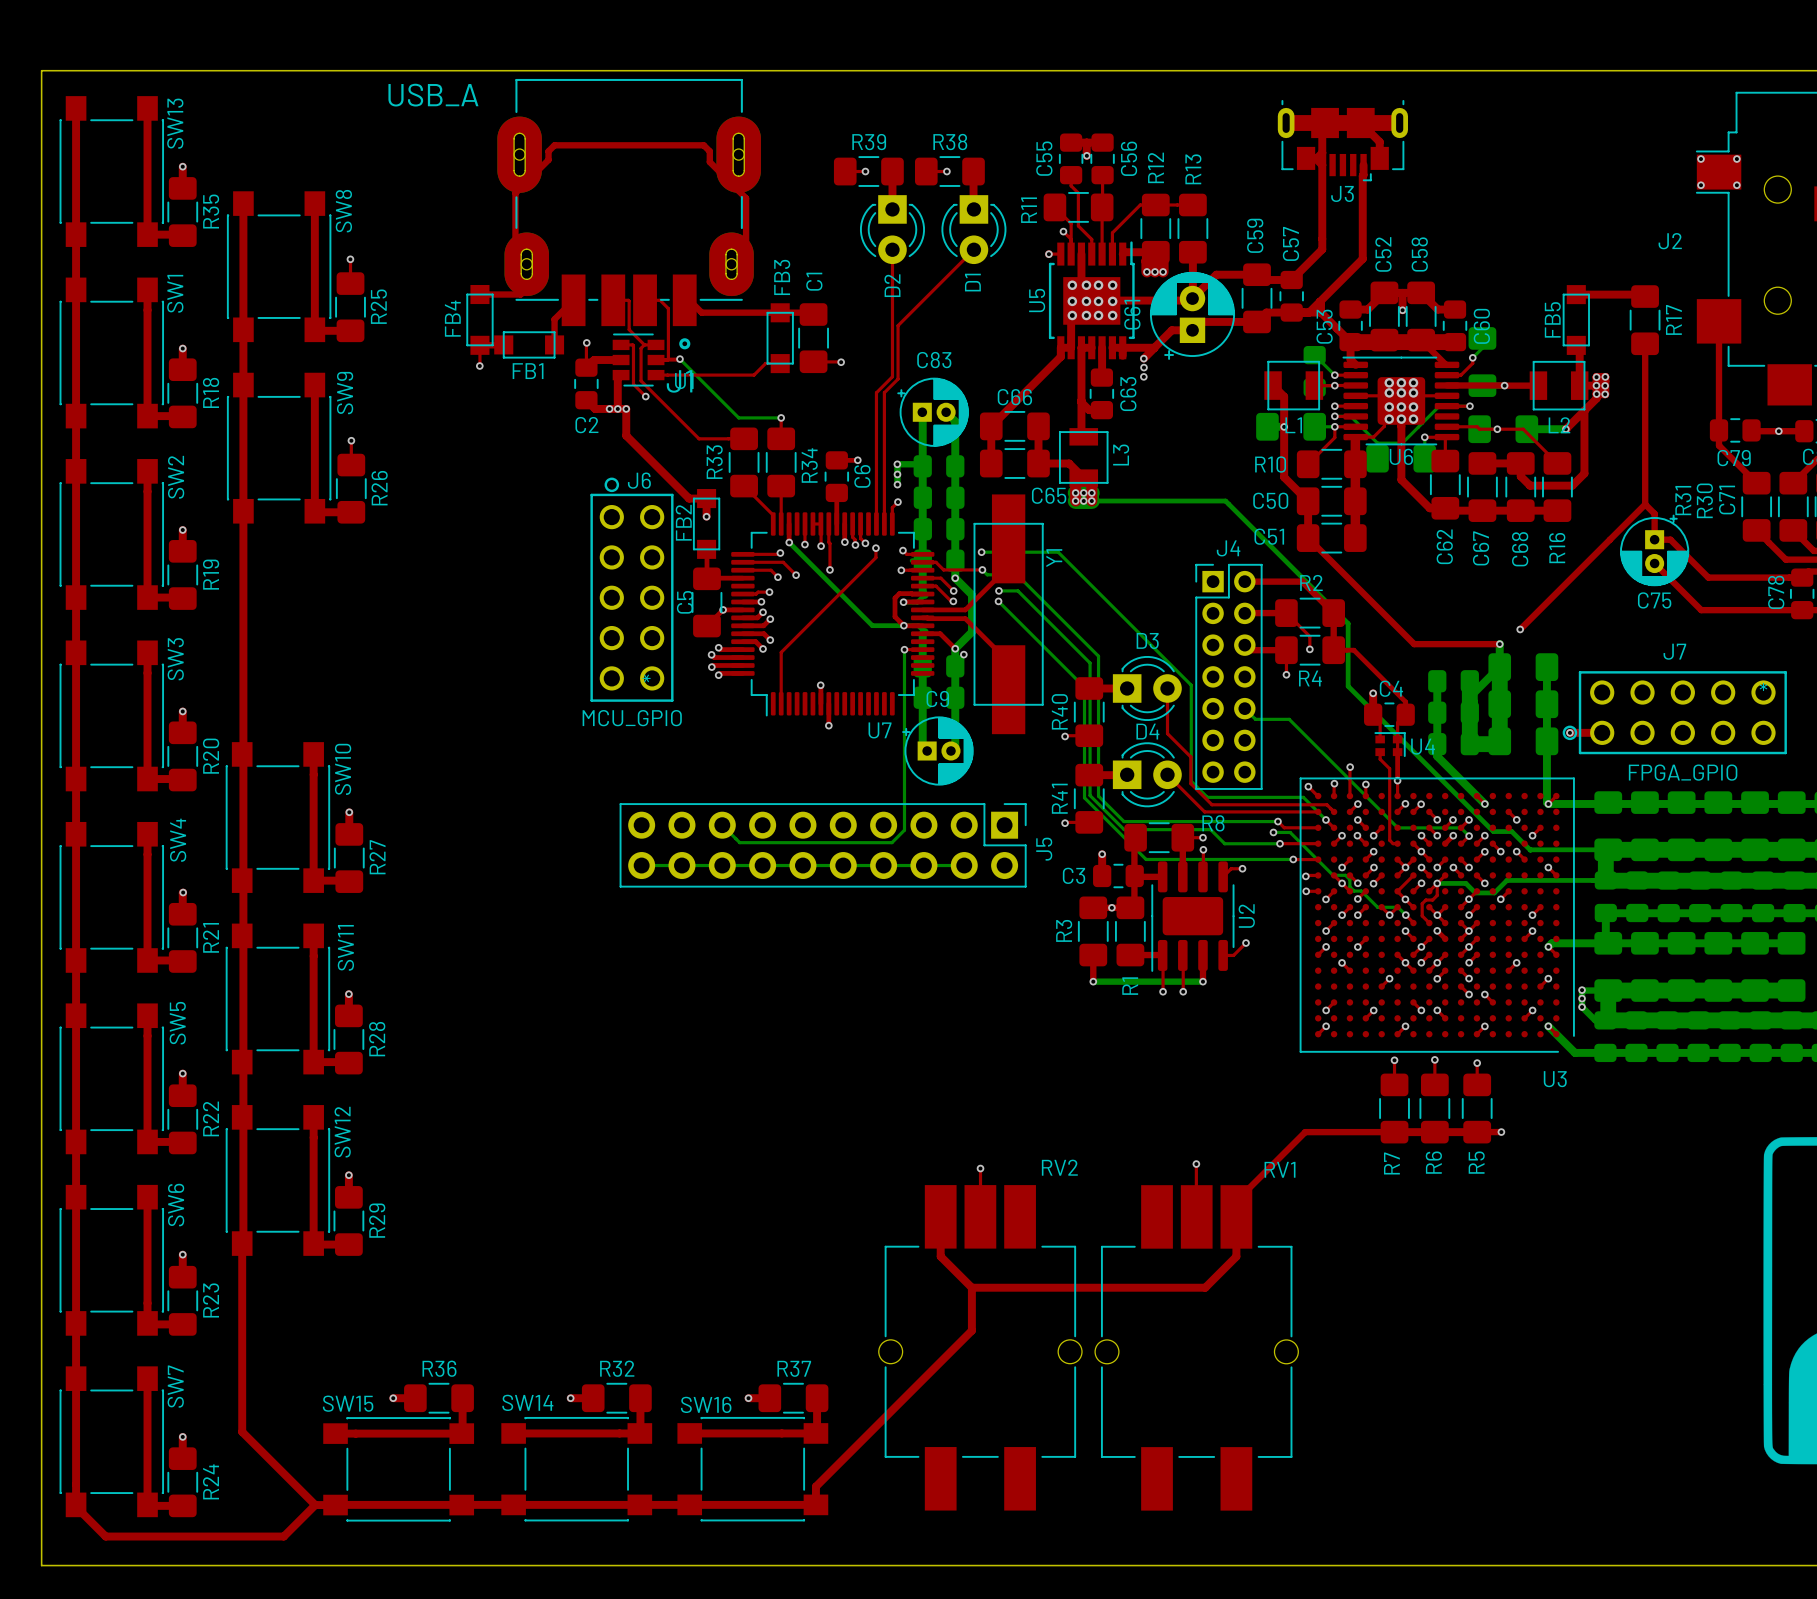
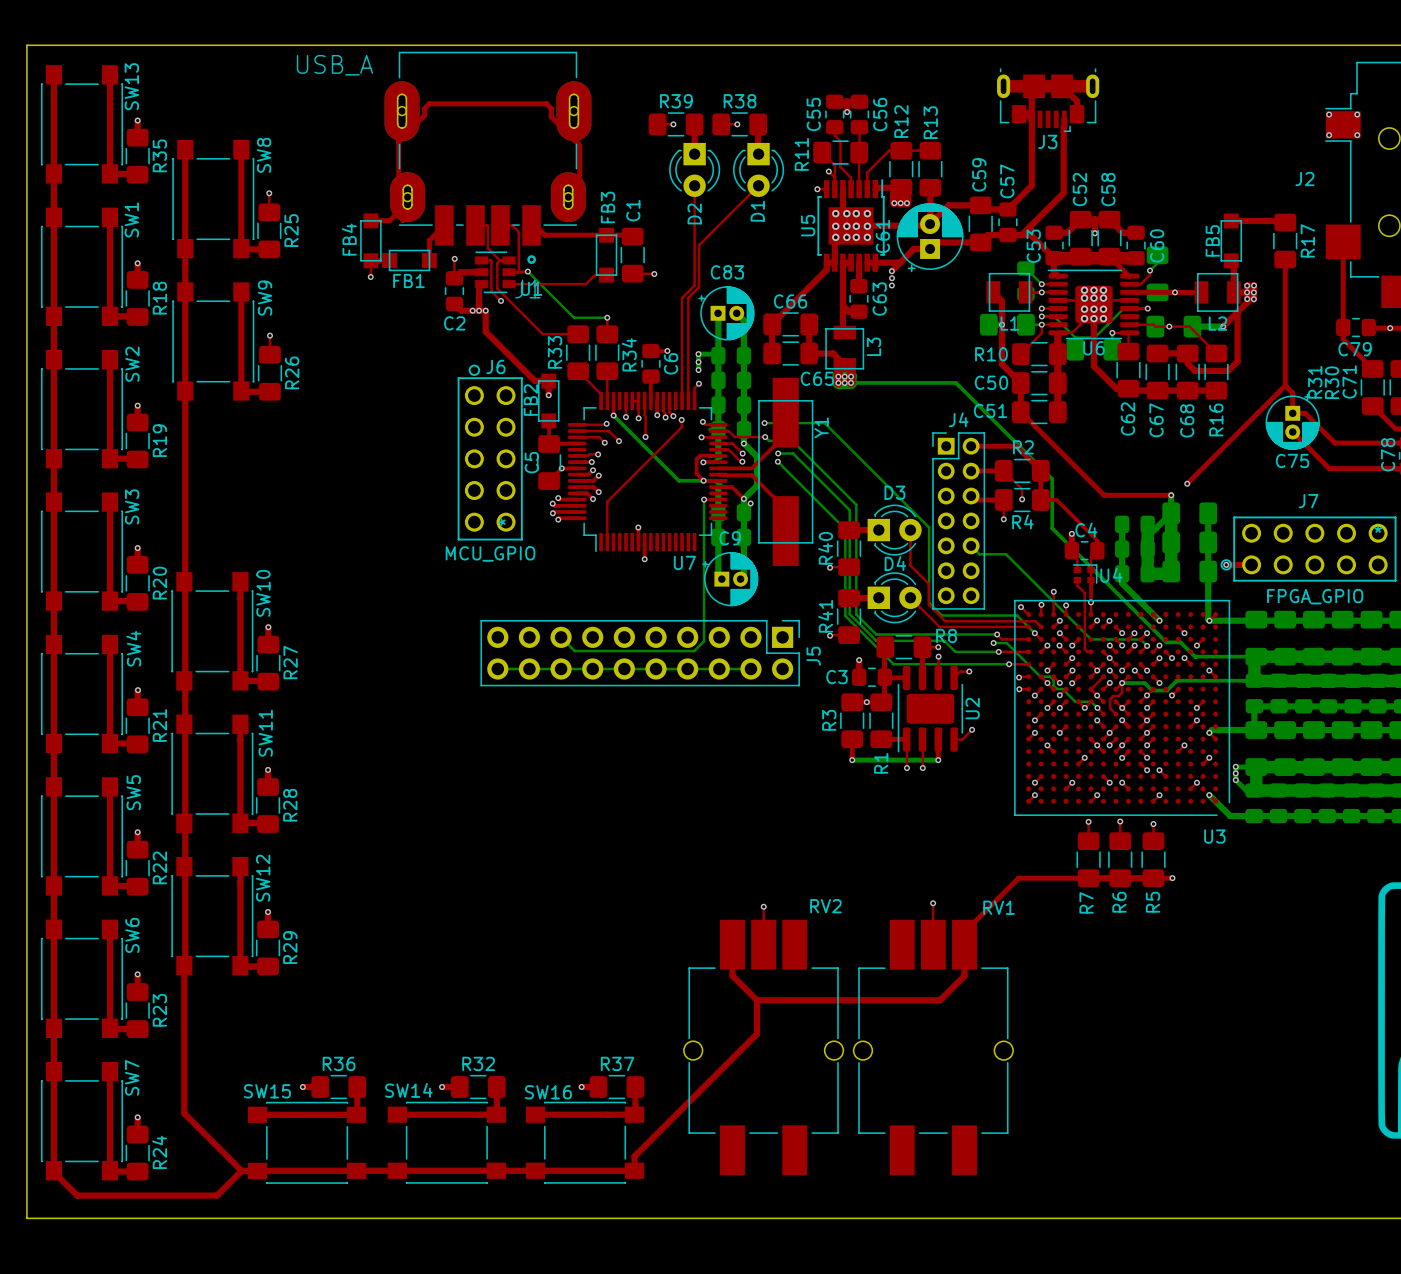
top track: none -> (398, 211) (389, 220) (367, 220)
top track: (479, 294) (520, 294) -> none

